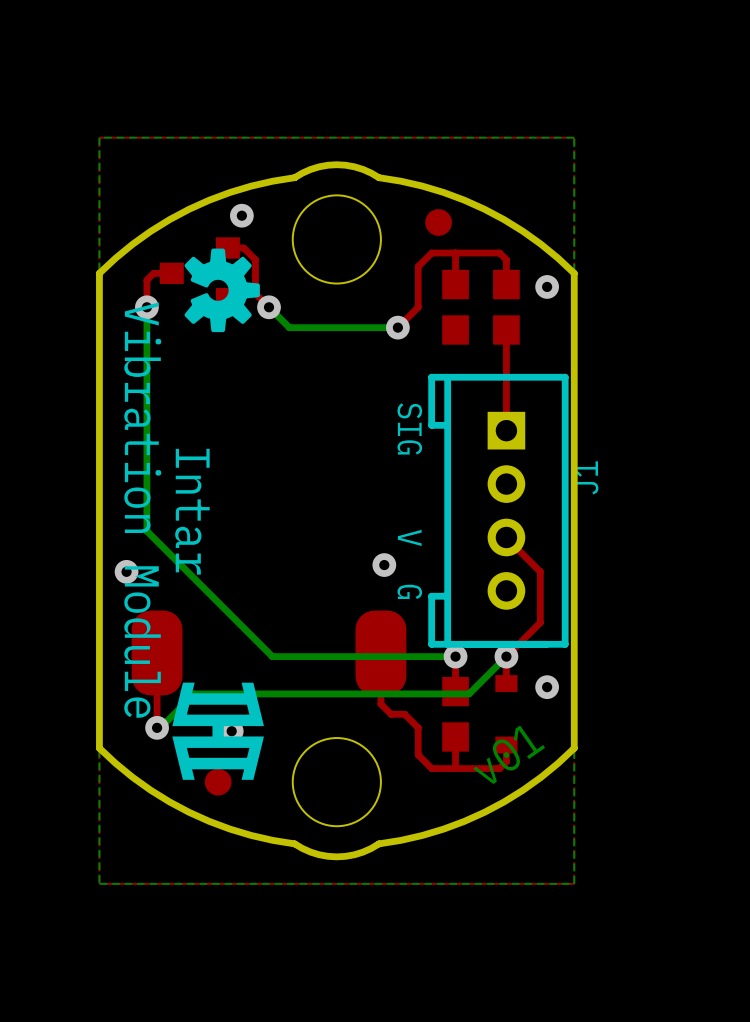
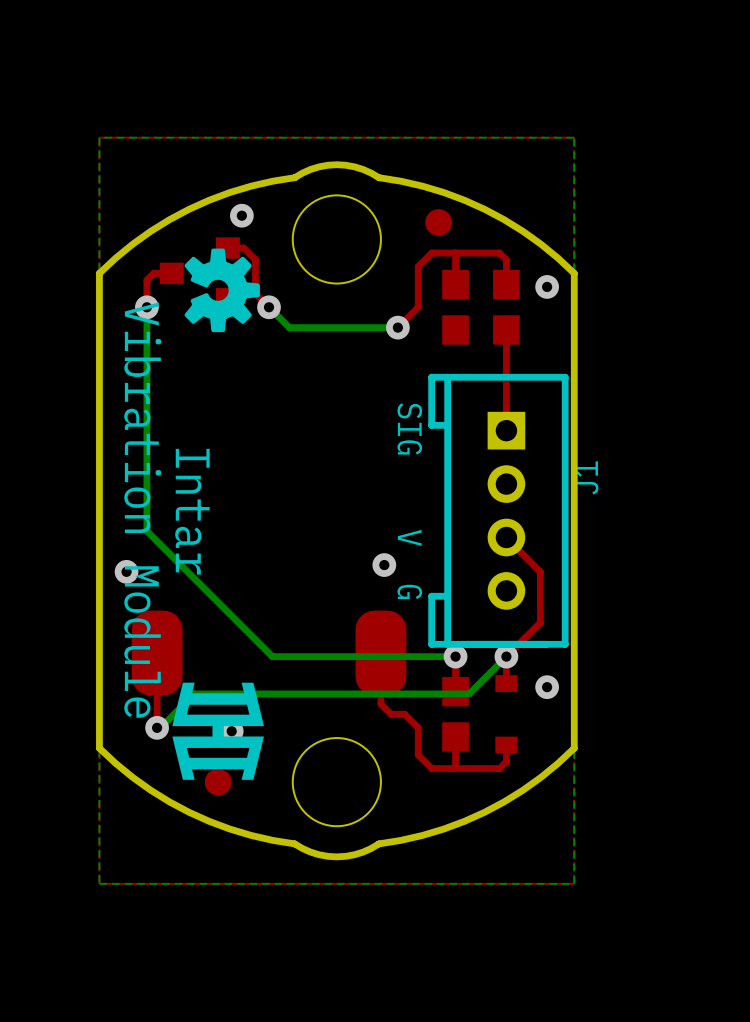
text: v01 (509, 754) -> none

